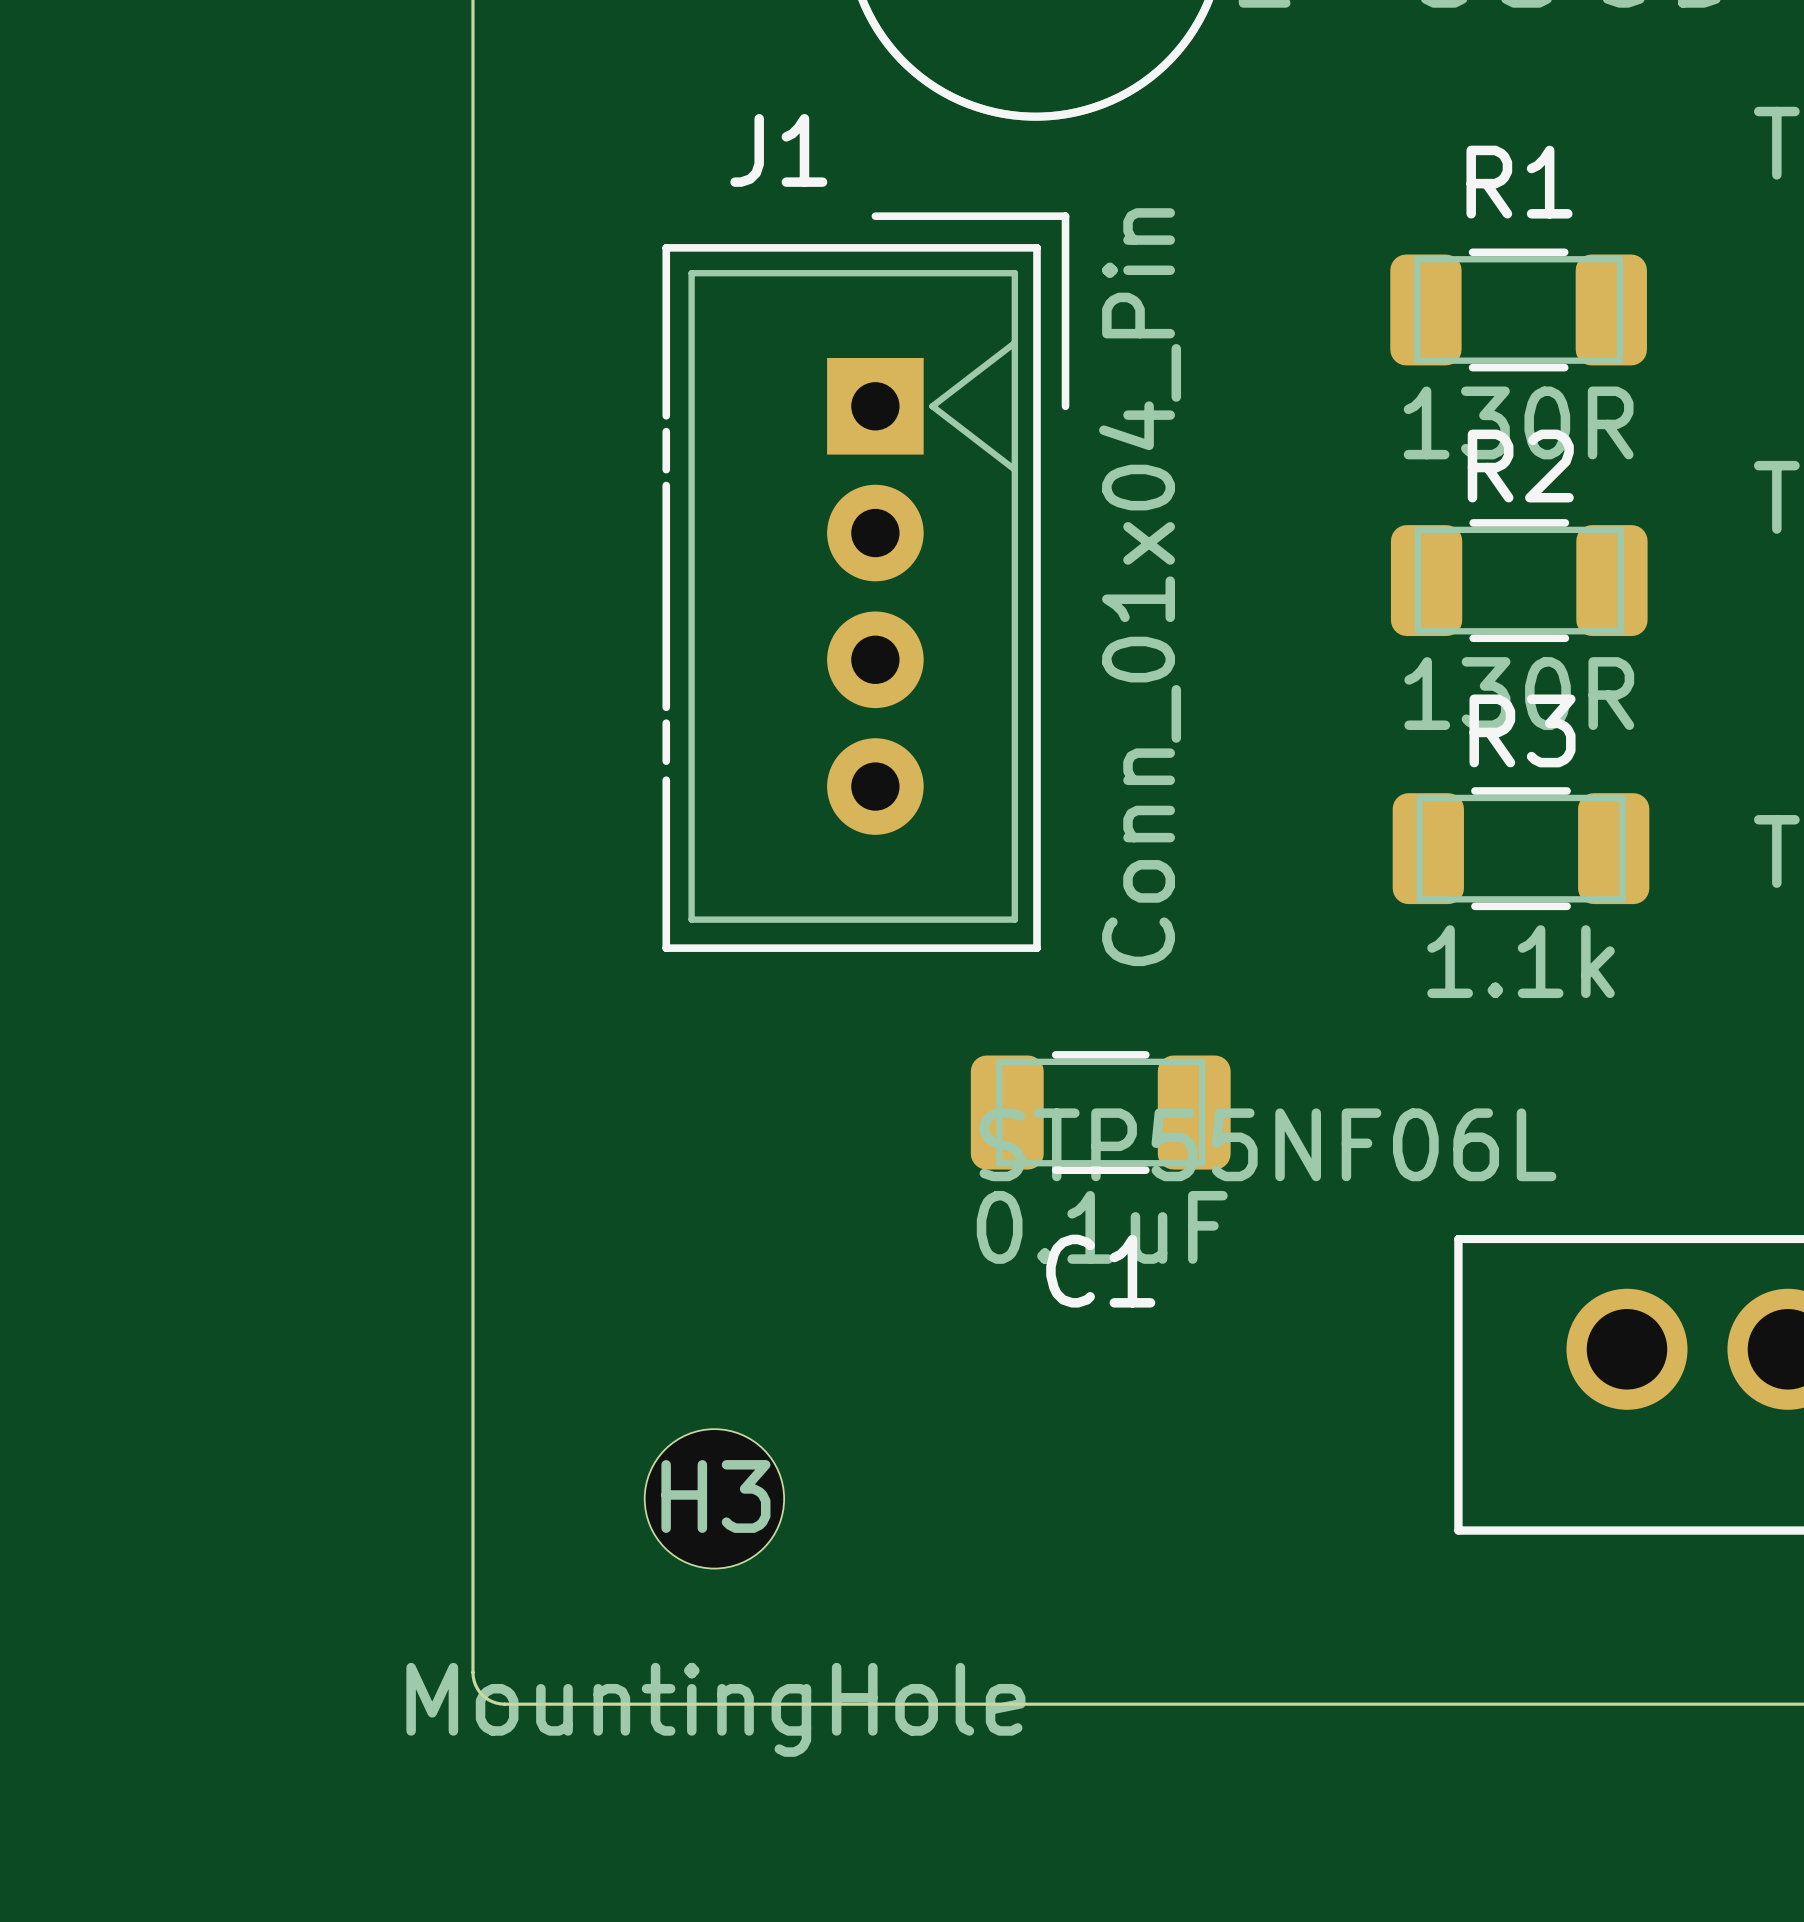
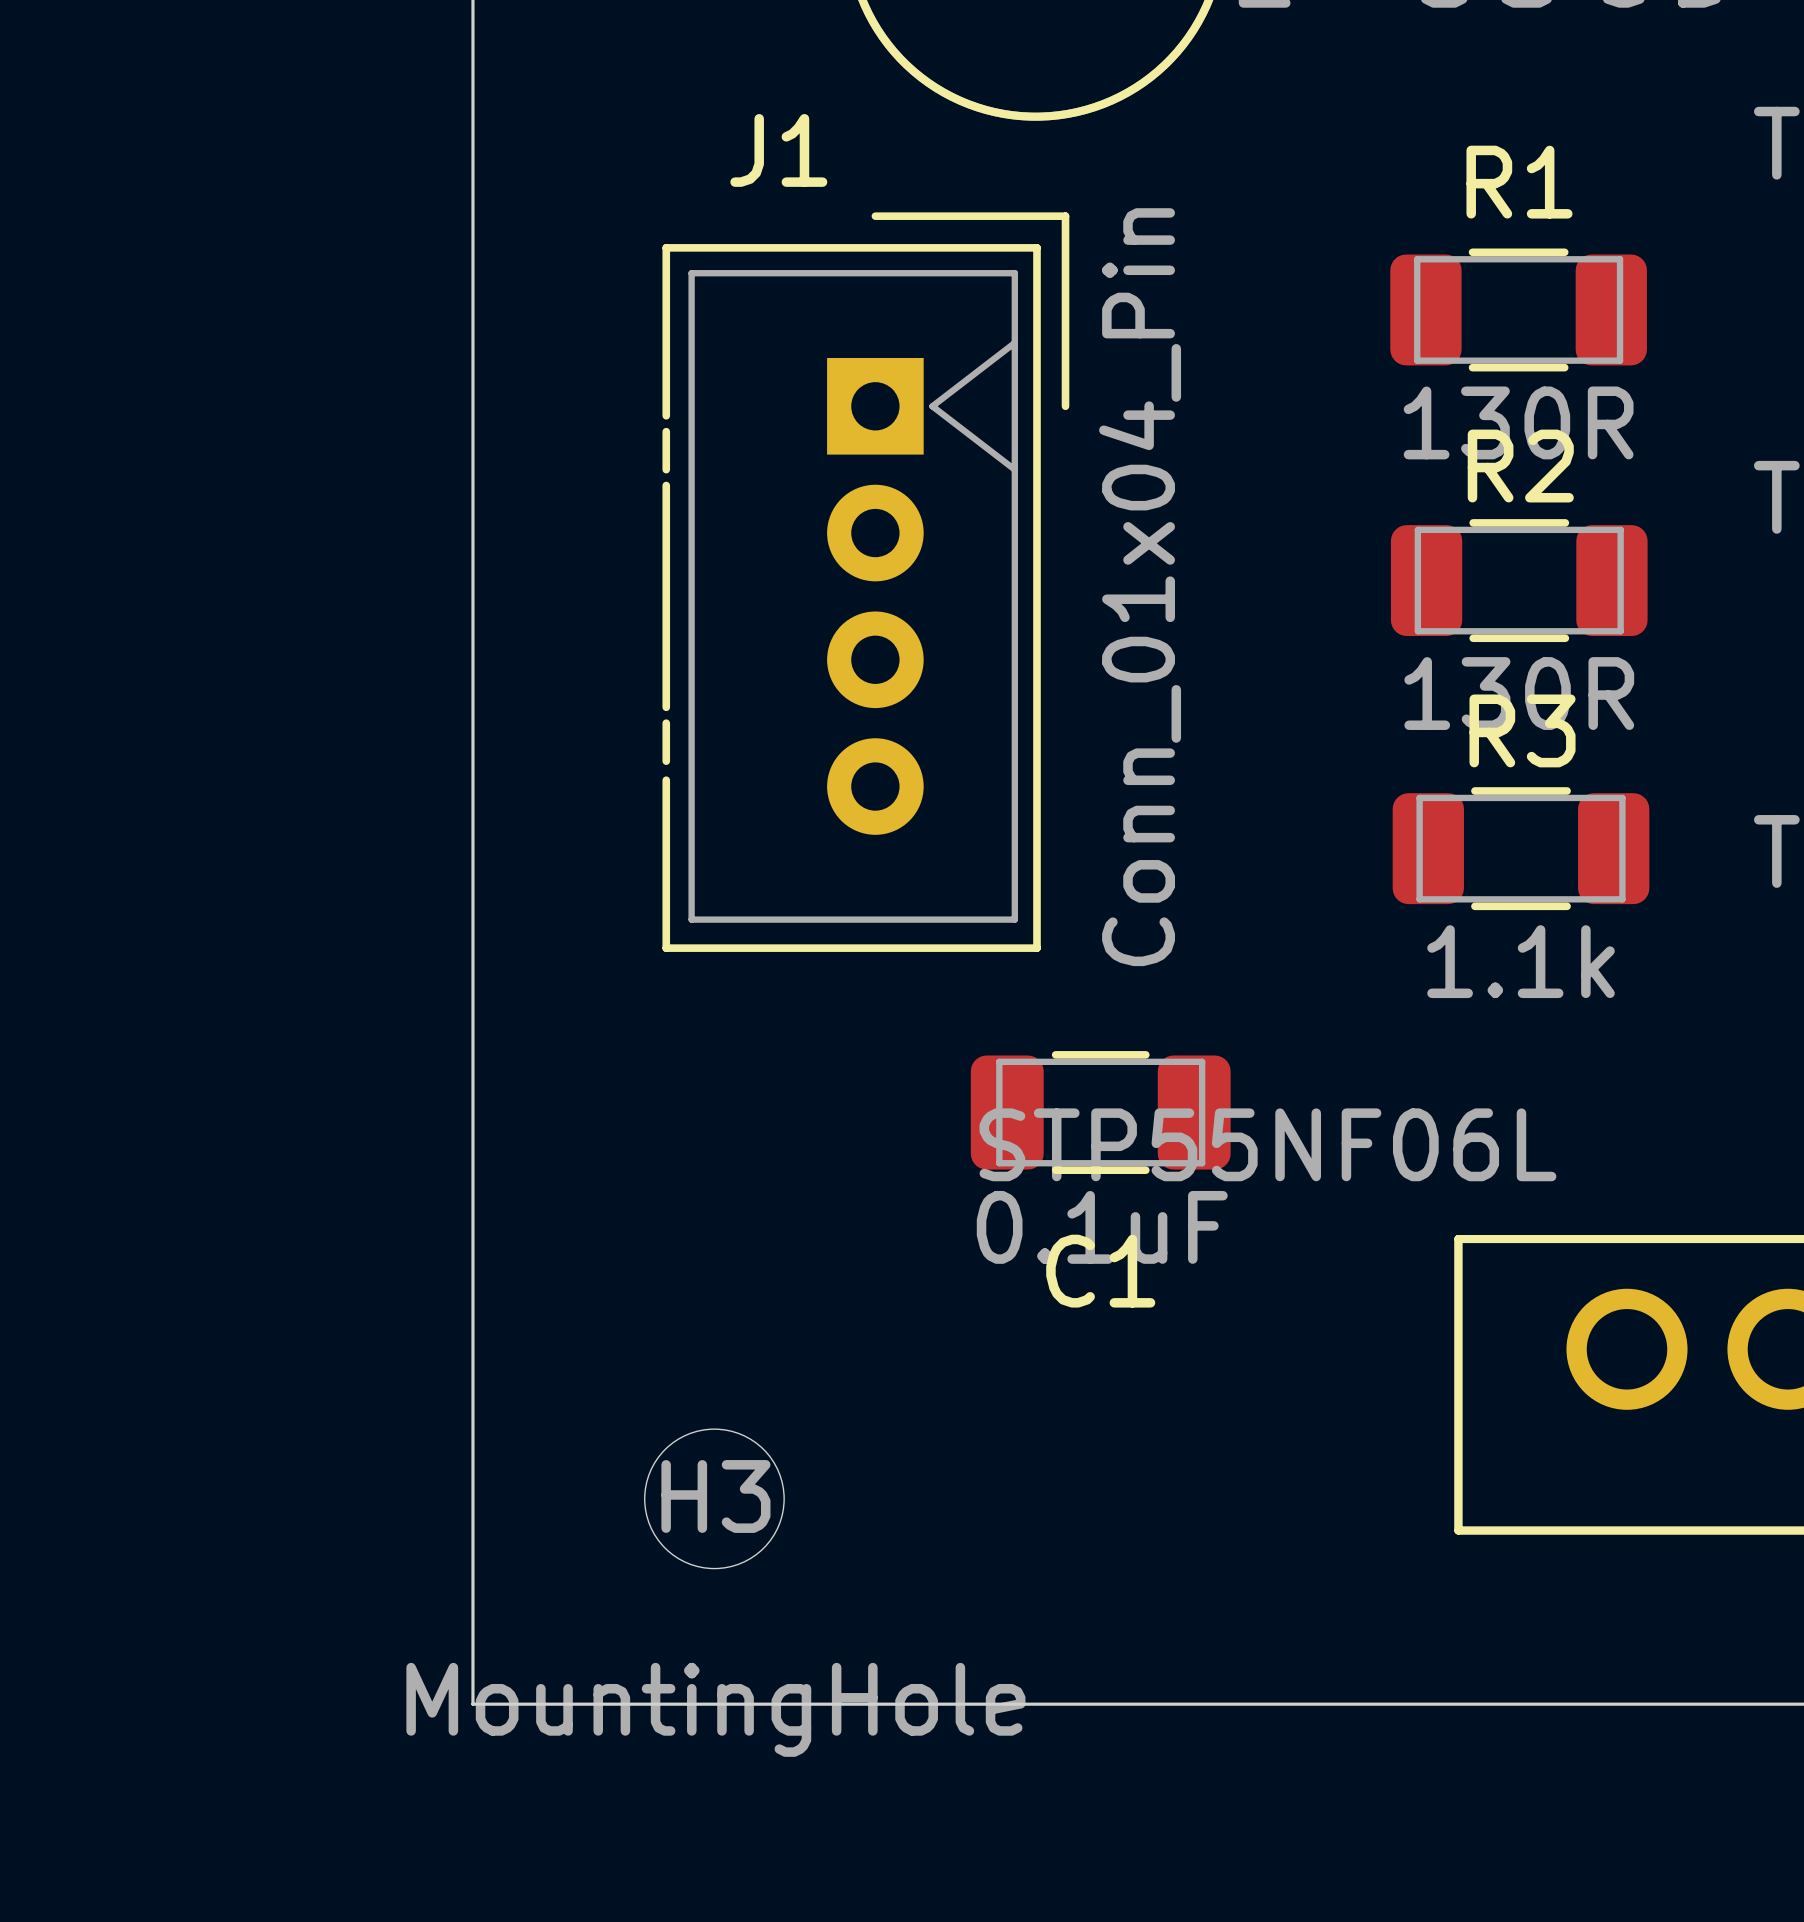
board edge: (472, 1672) (475, 1684) (482, 1694) (492, 1701) (504, 1704) -> (472, 1672) (472, 1704) (504, 1704)

